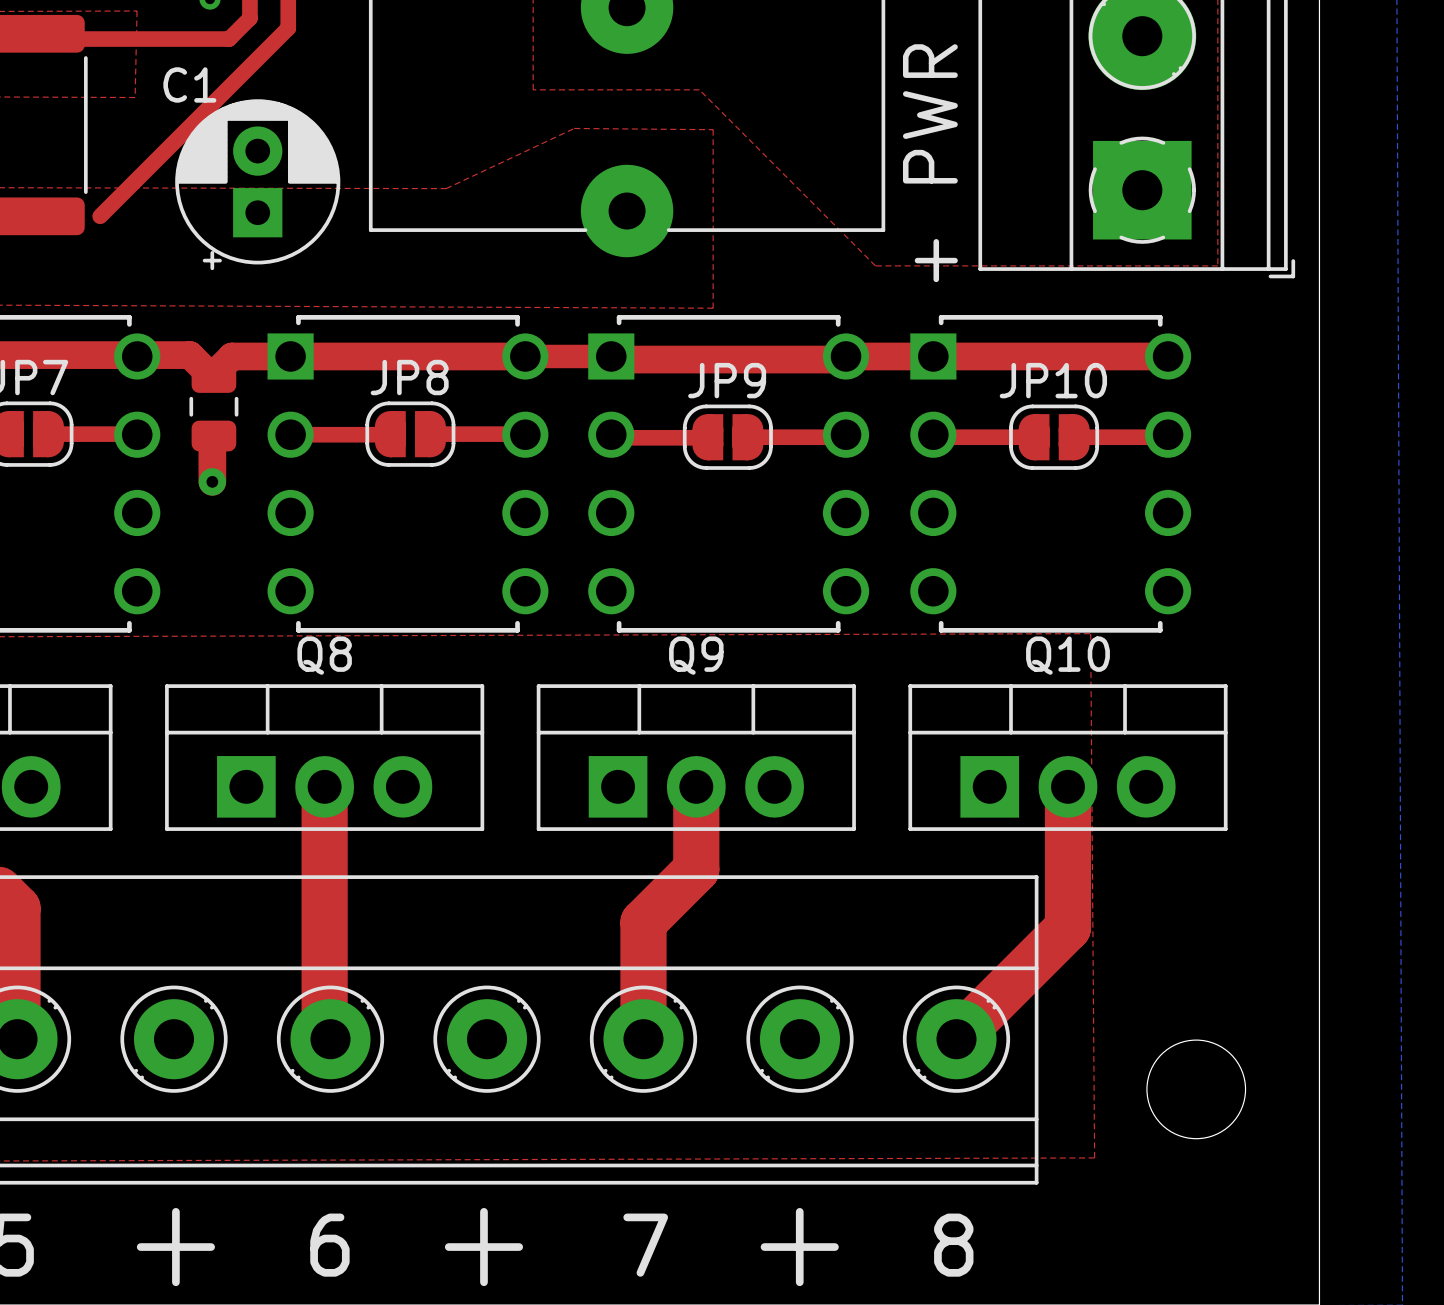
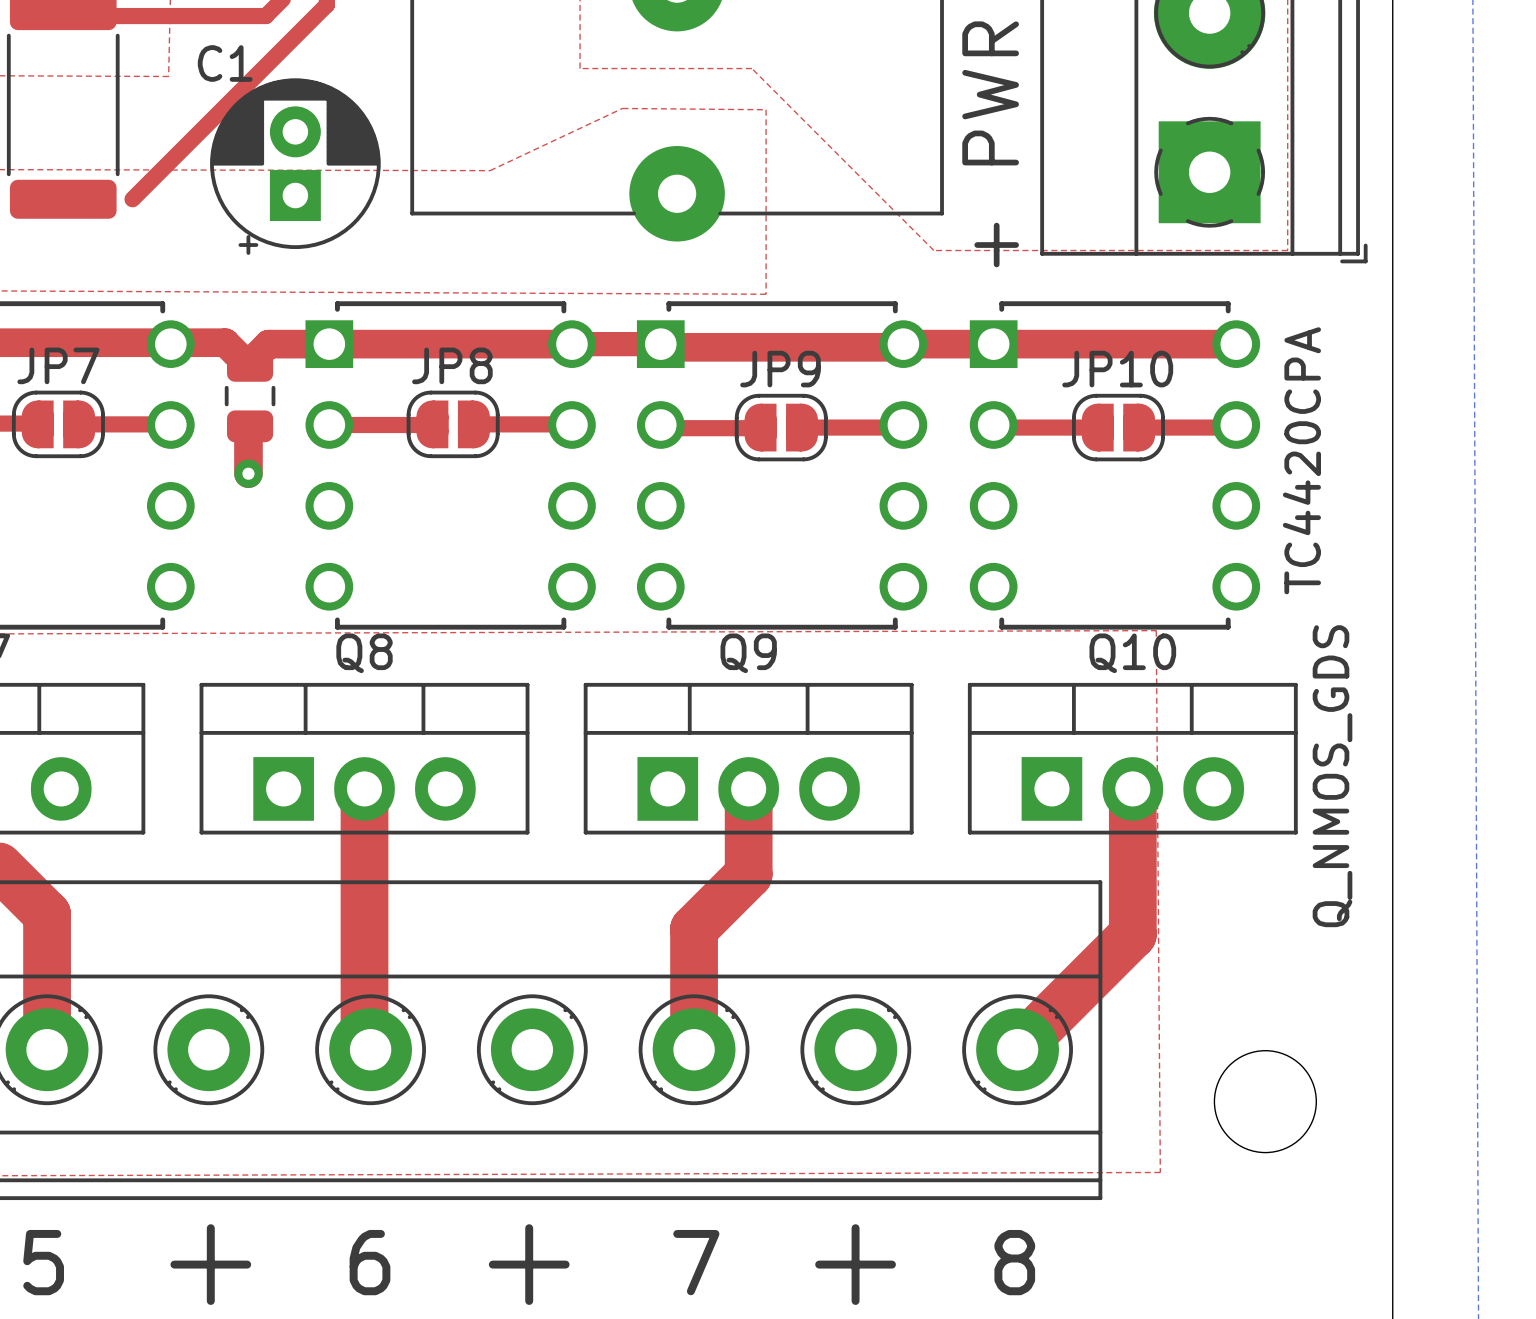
part value: none -> TC4420CPA (1301, 460)
Q10 value: none -> Q_NMOS_GDS (1332, 776)

